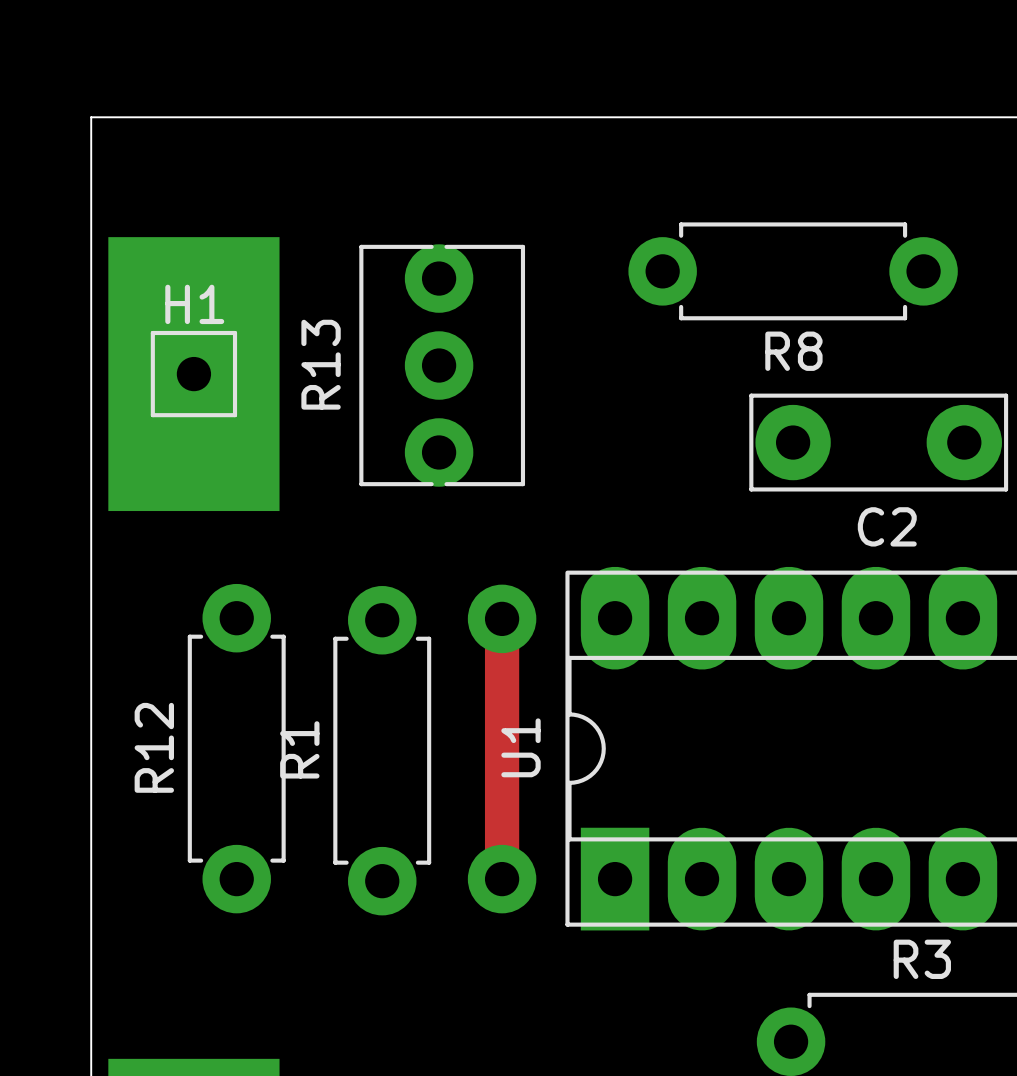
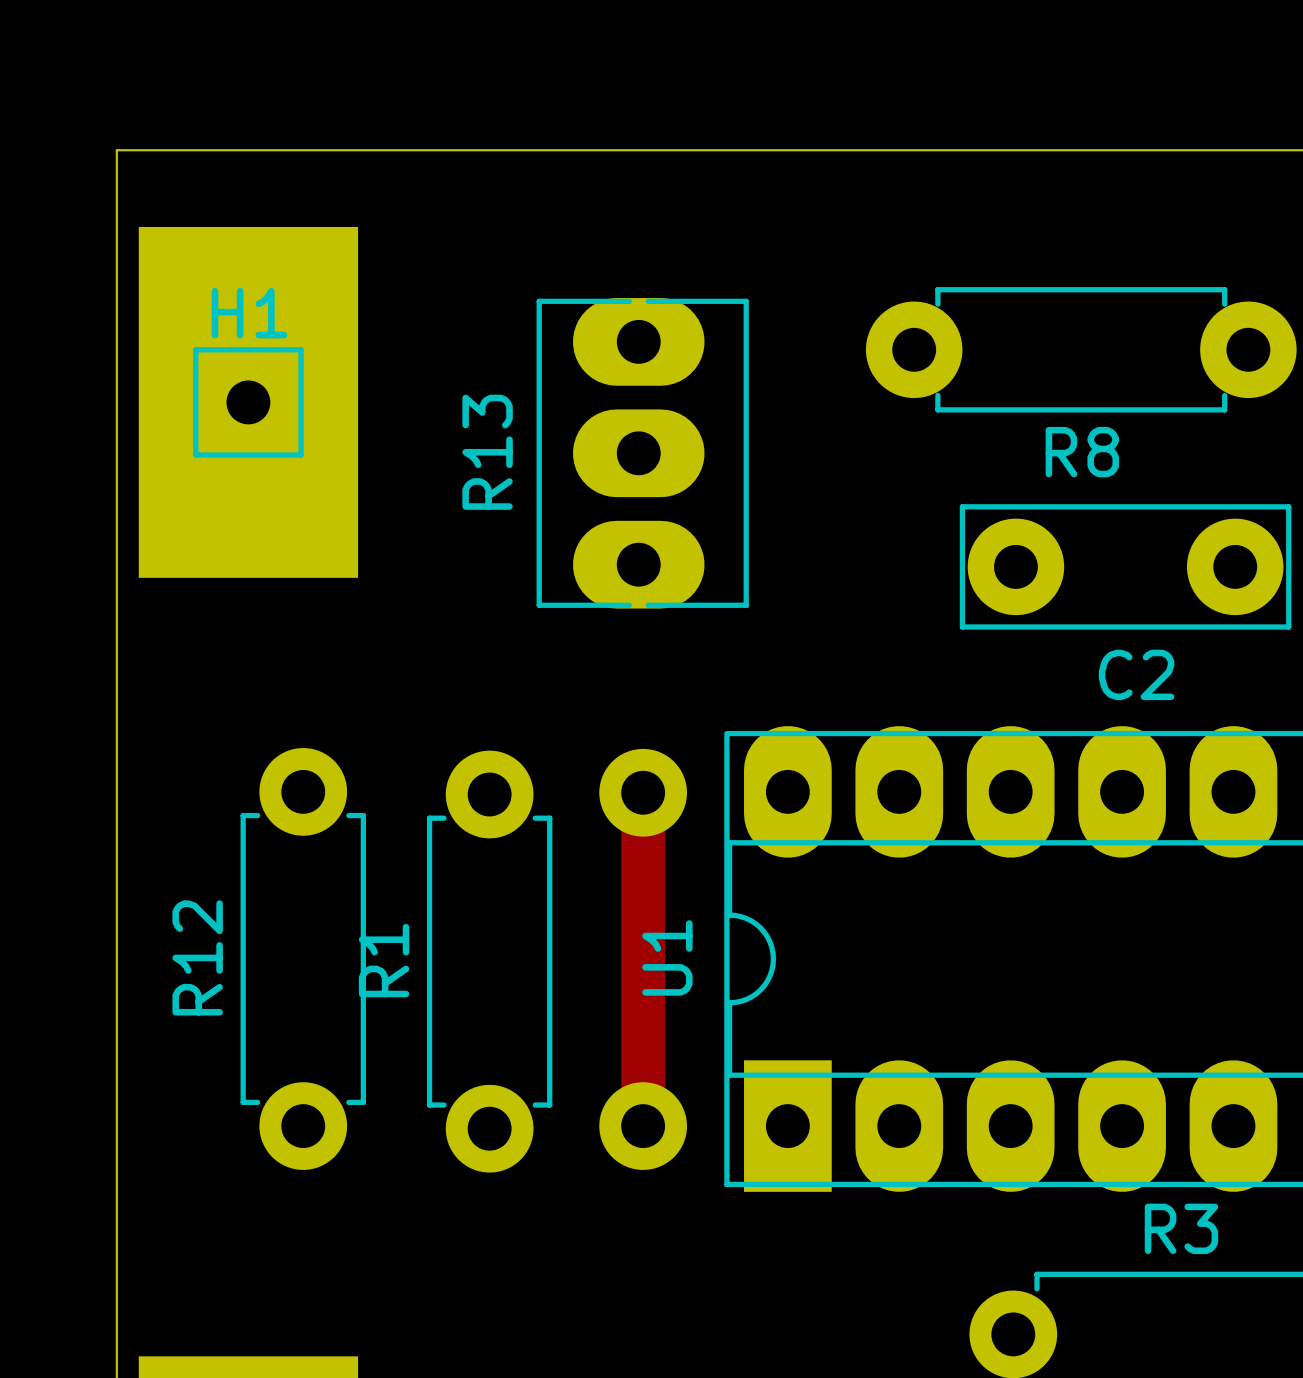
R8 footprint: [628, 222, 958, 321] -> [865, 287, 1297, 413]
R13 footprint: [359, 244, 526, 487] -> [536, 298, 749, 609]
H1 position: (193, 374) -> (248, 402)

